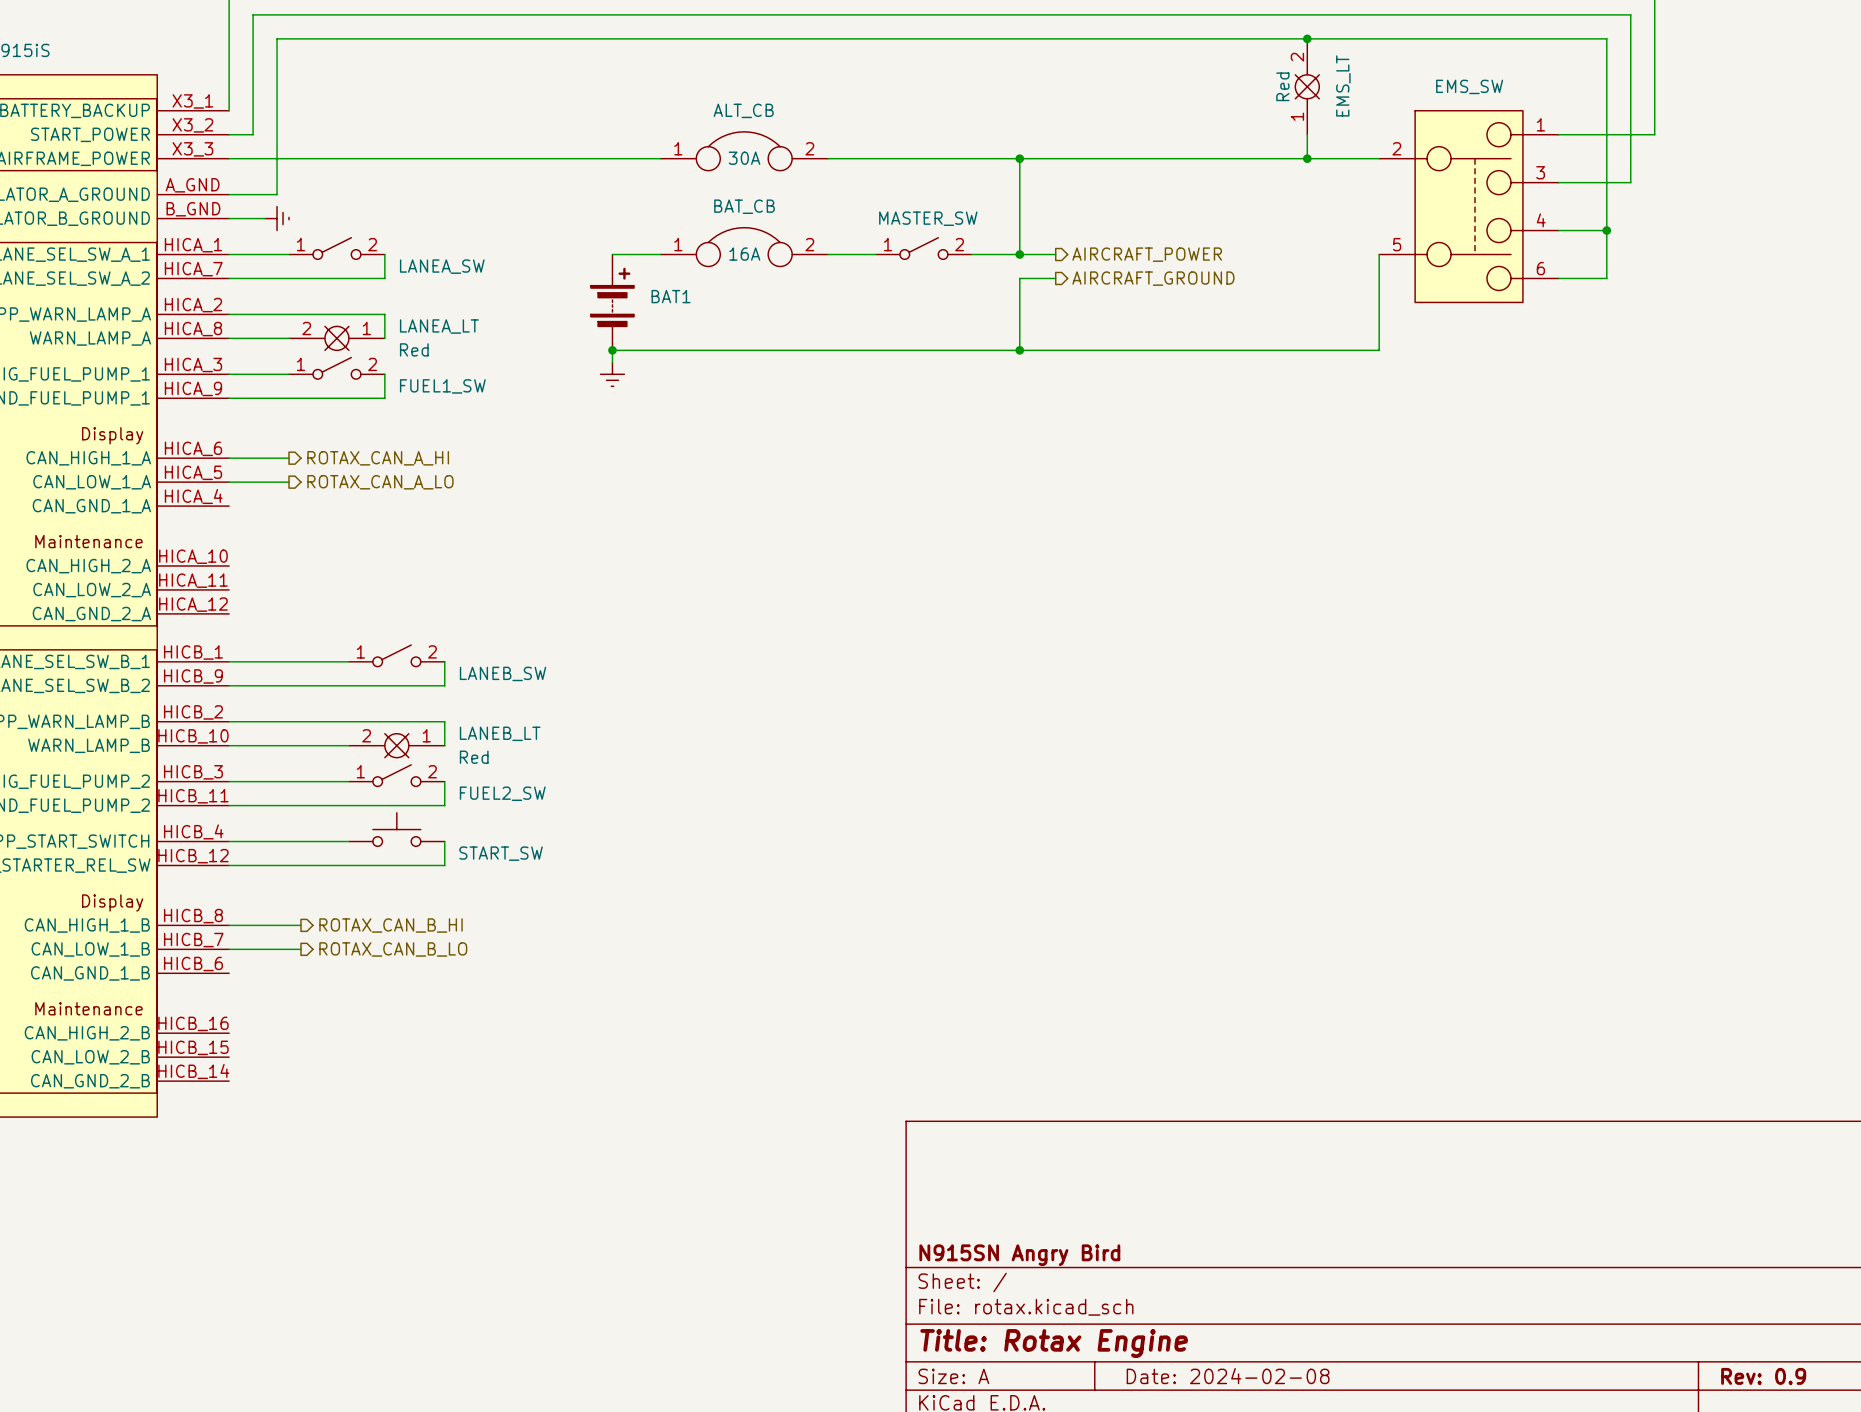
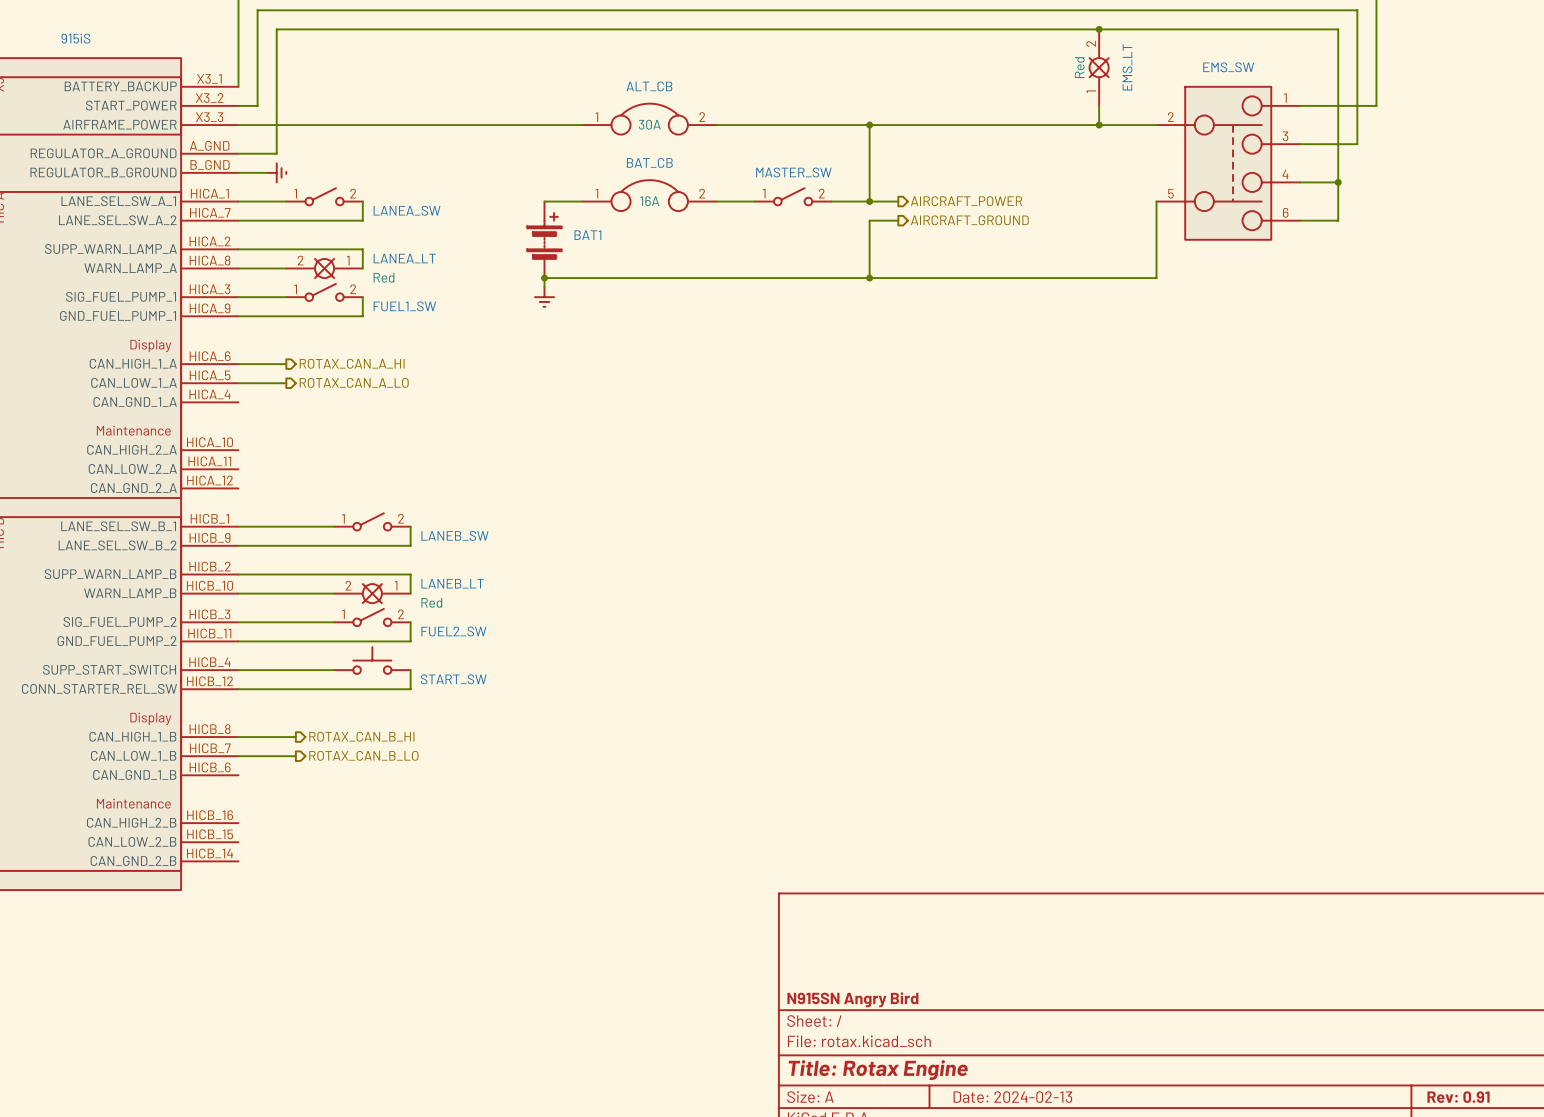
title block: Date: 2024-02-08 (1228, 1376) -> Date: 2024-02-13 (1012, 1097)
title block: Rev: 0.9 (1763, 1376) -> Rev: 0.91 (1458, 1097)

